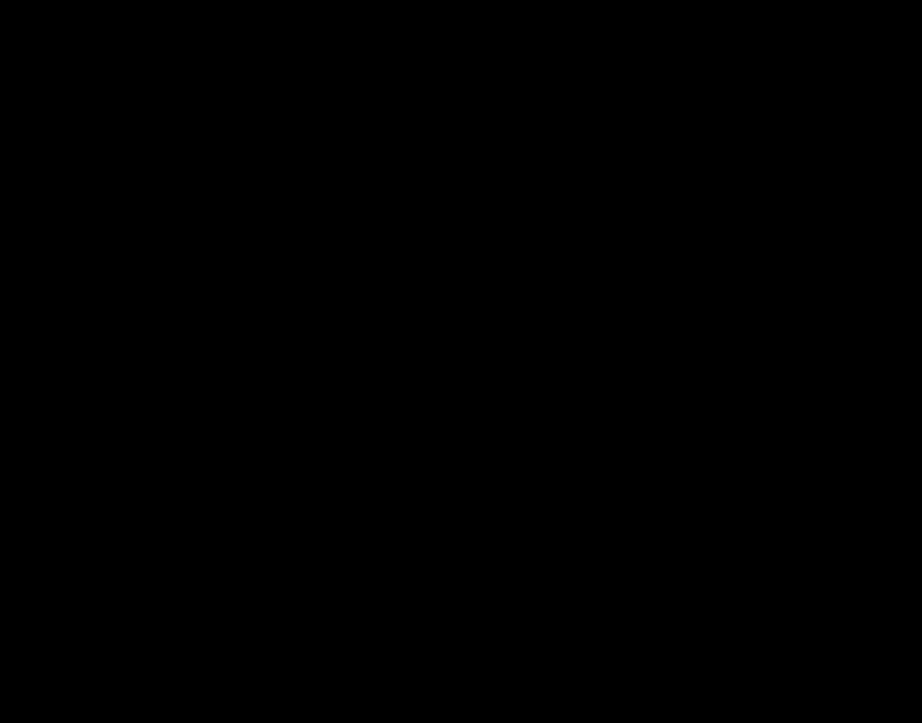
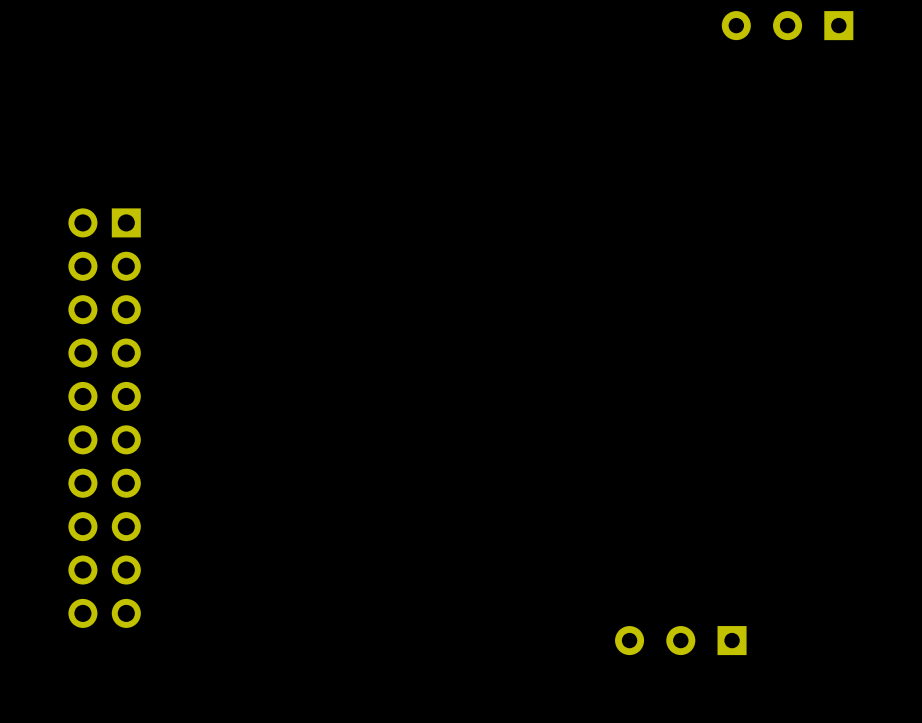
part: none -> (787, 25)
part: none -> (104, 418)
part: none -> (680, 640)

